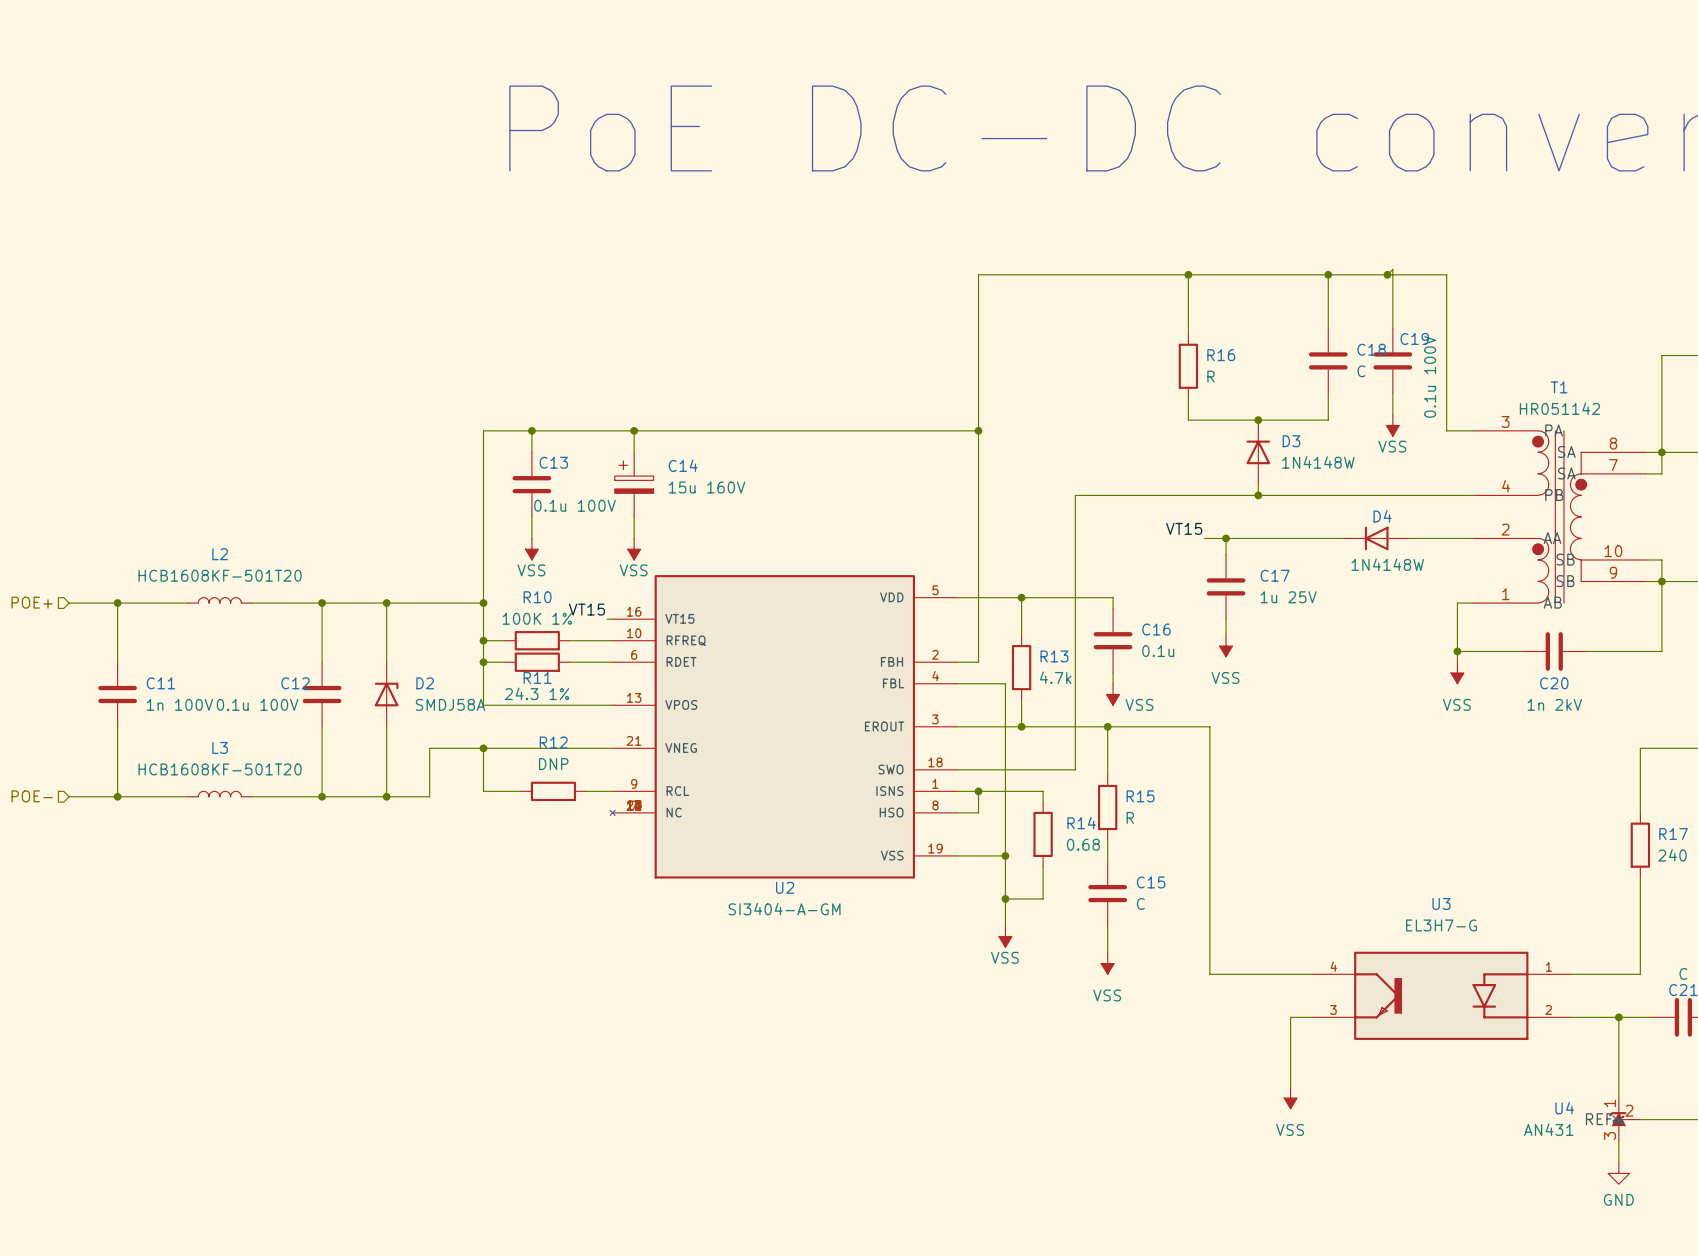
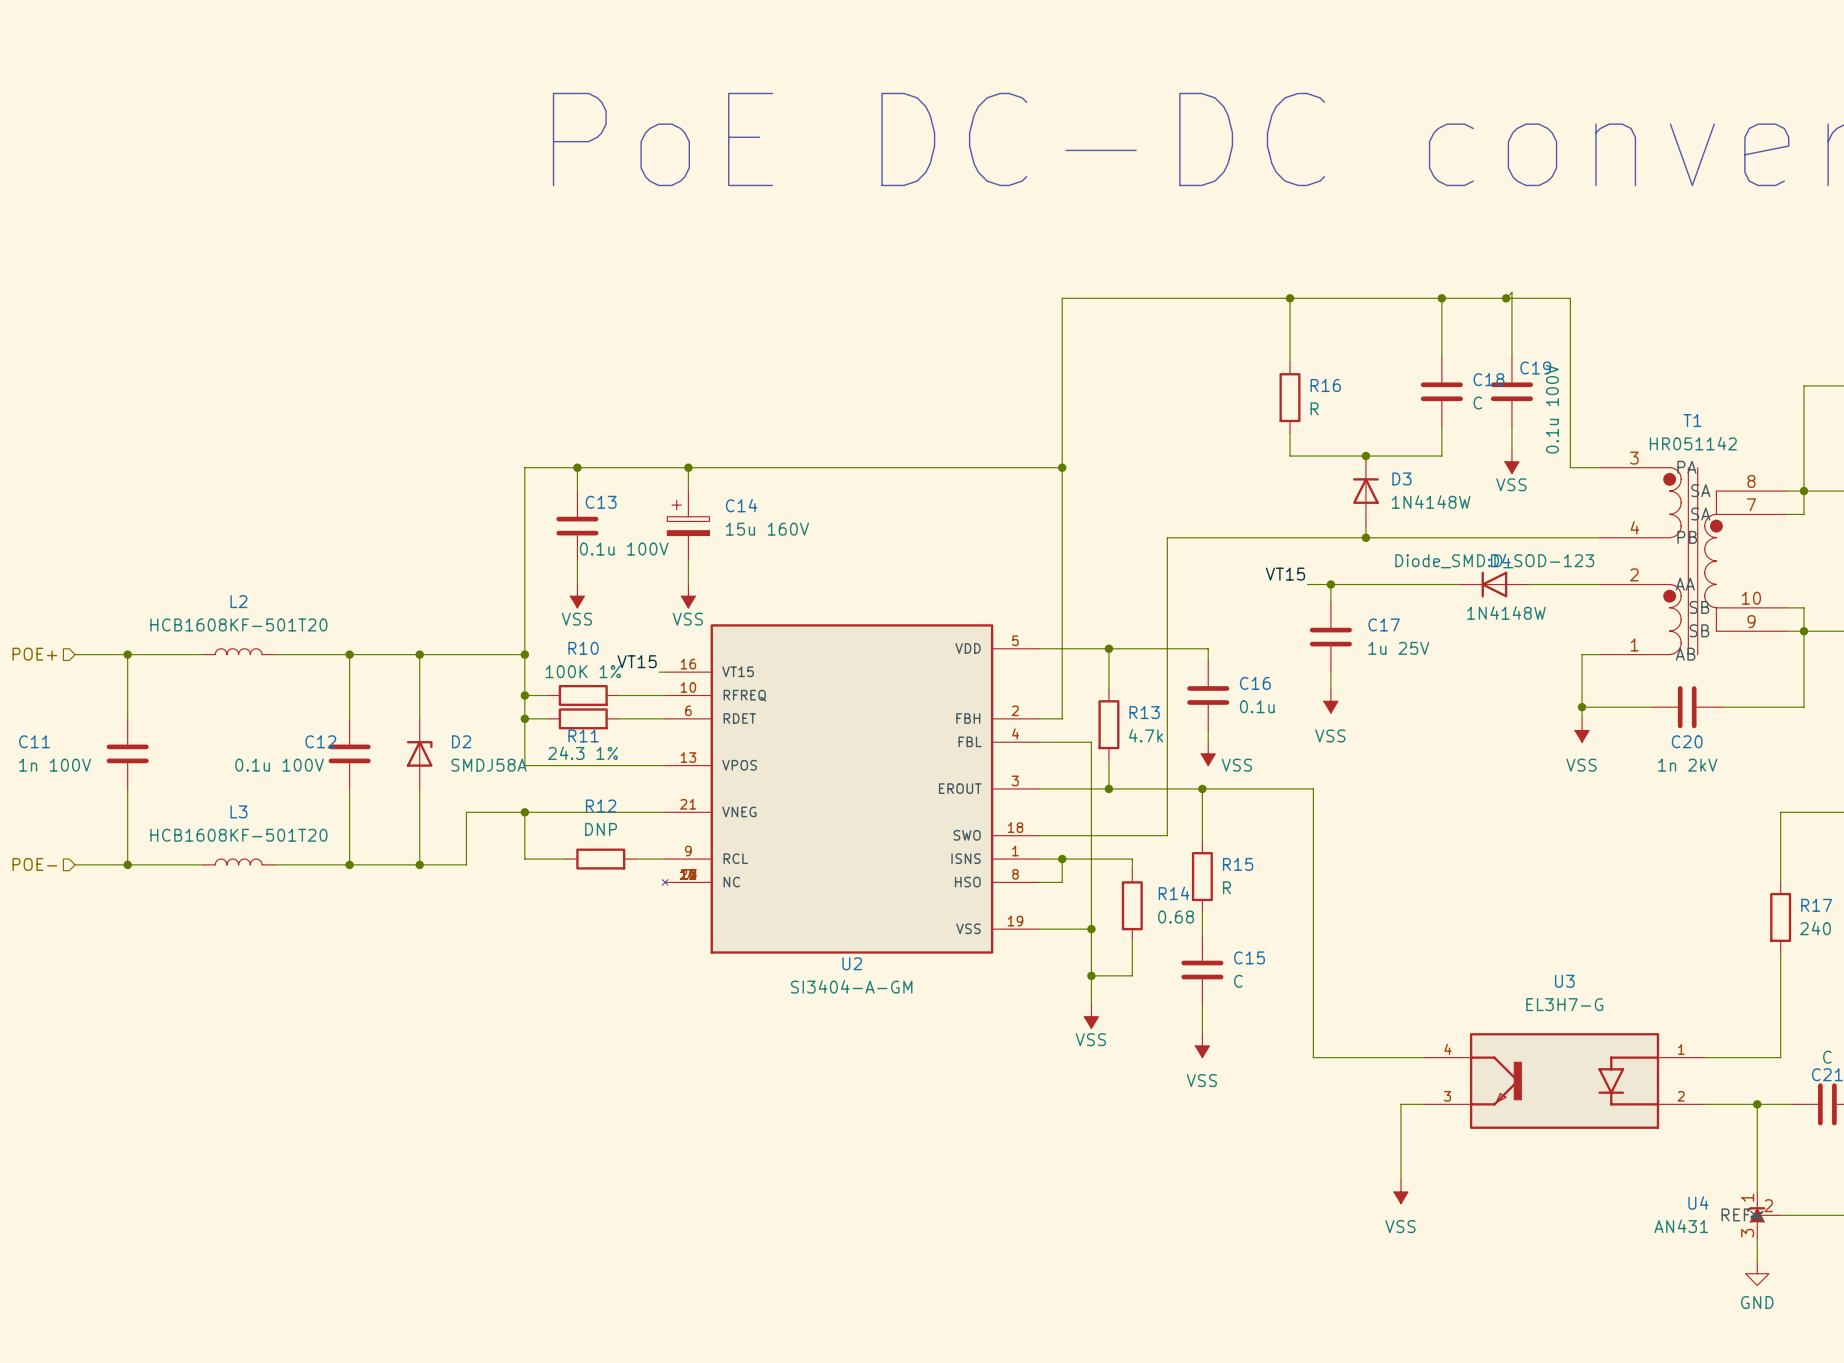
D4 text: none -> Diode_SMD:D_SOD-123 (1494, 561)
C11 name position: C11 (160, 683) -> C11 (34, 741)
C11 value position: 1n 100V (179, 704) -> 1n 100V (55, 765)

